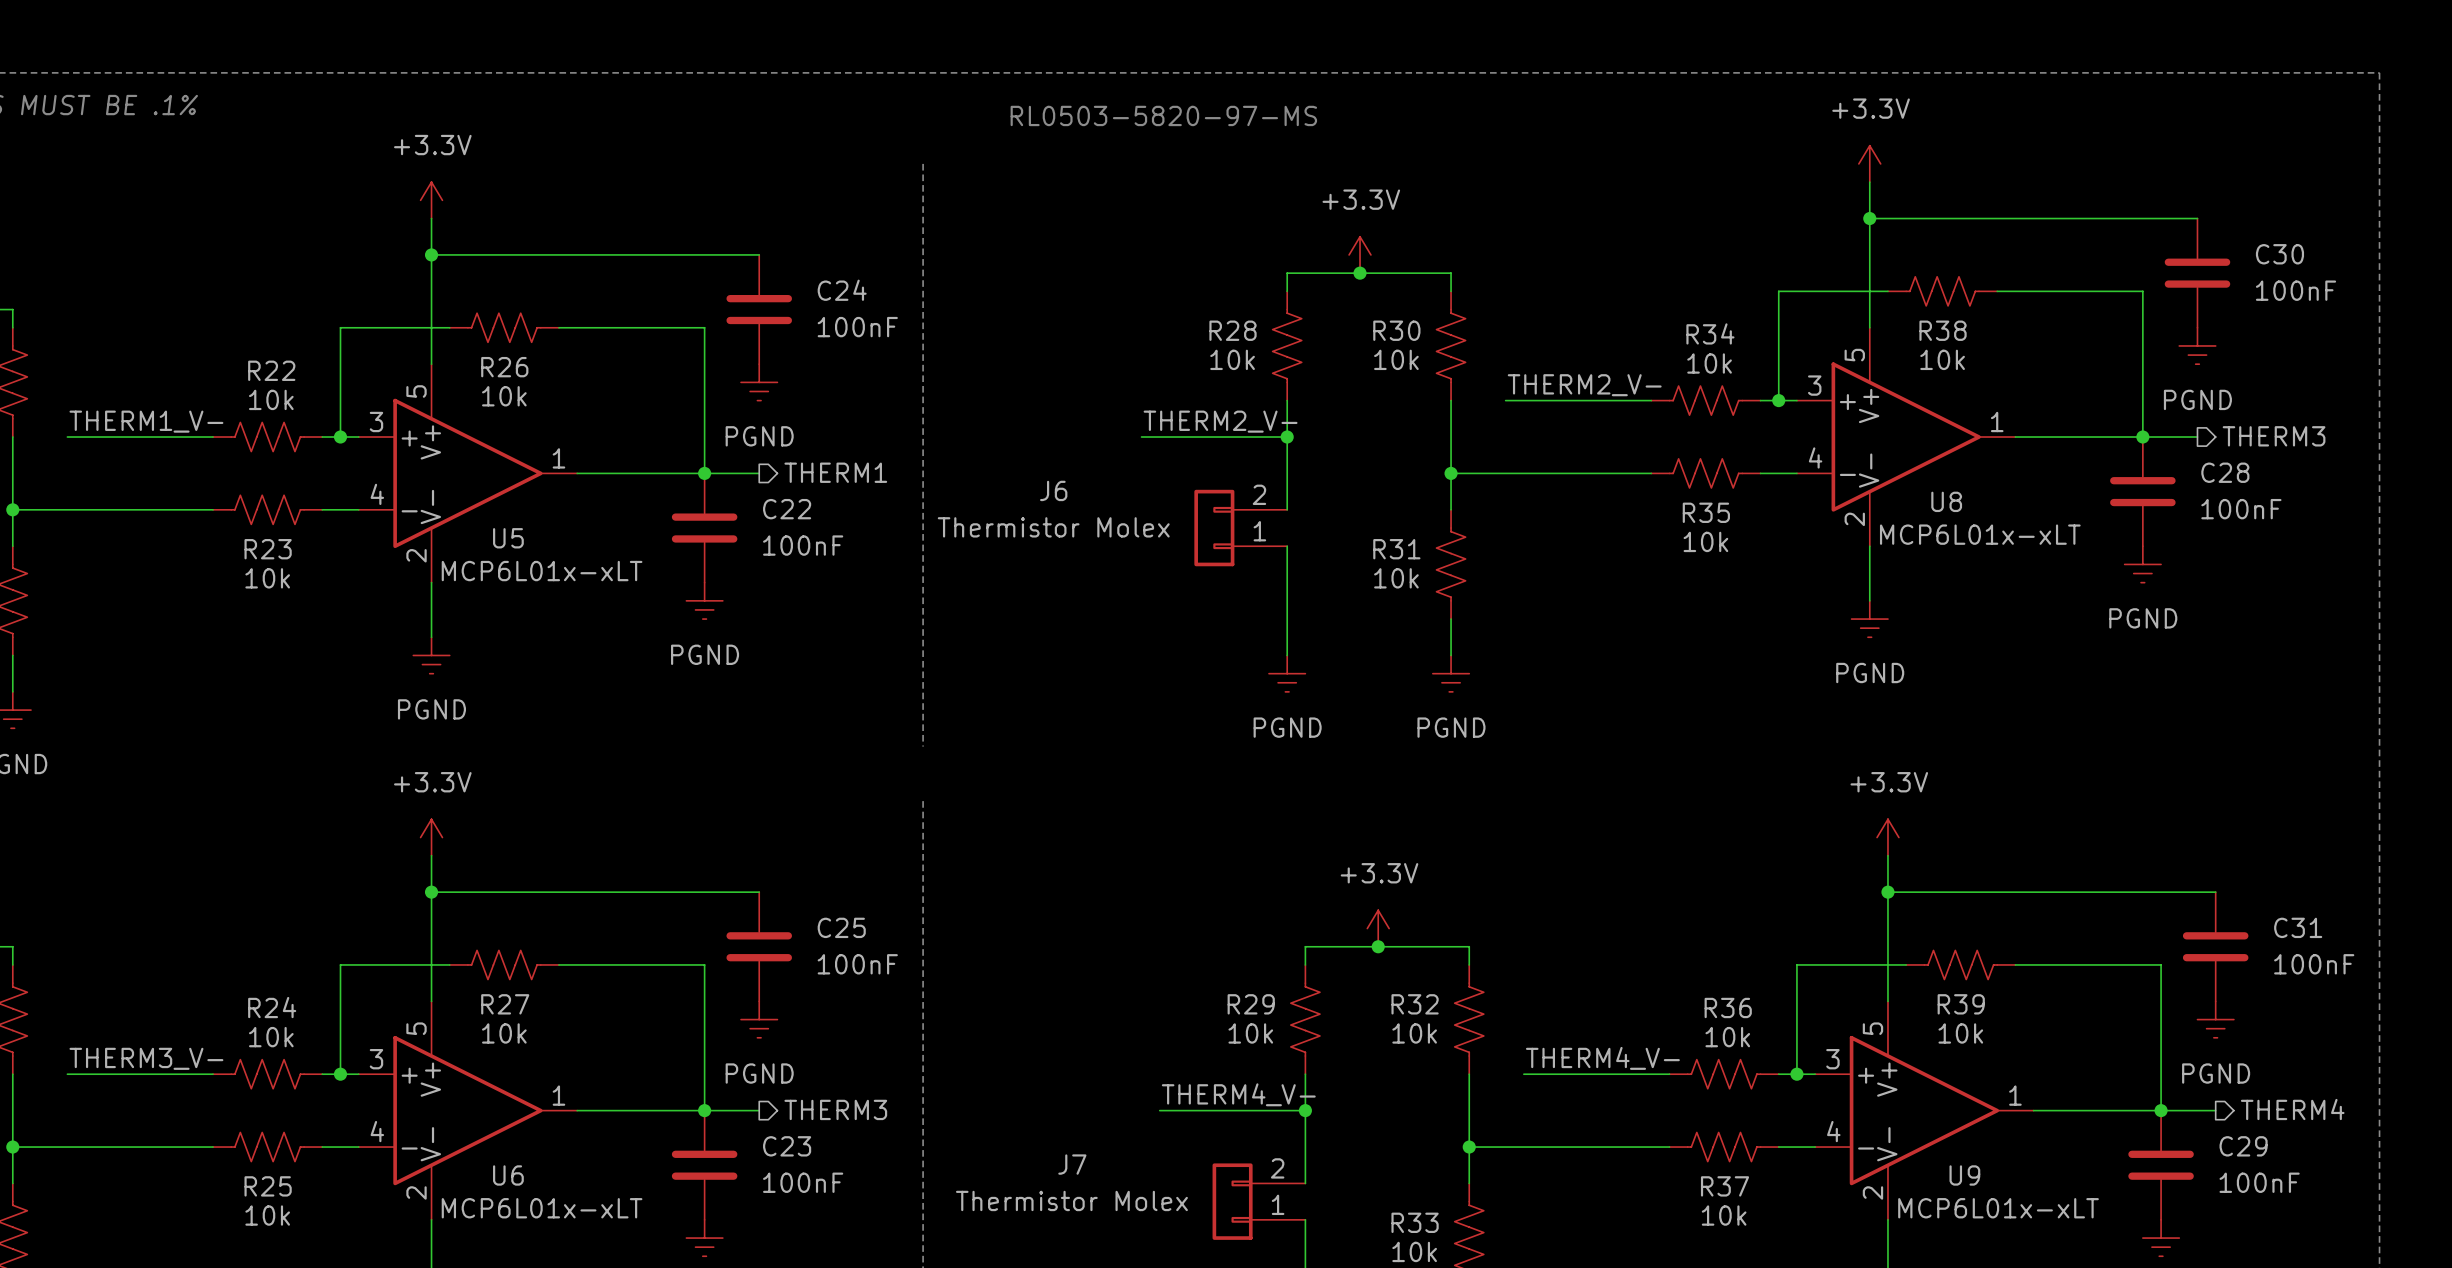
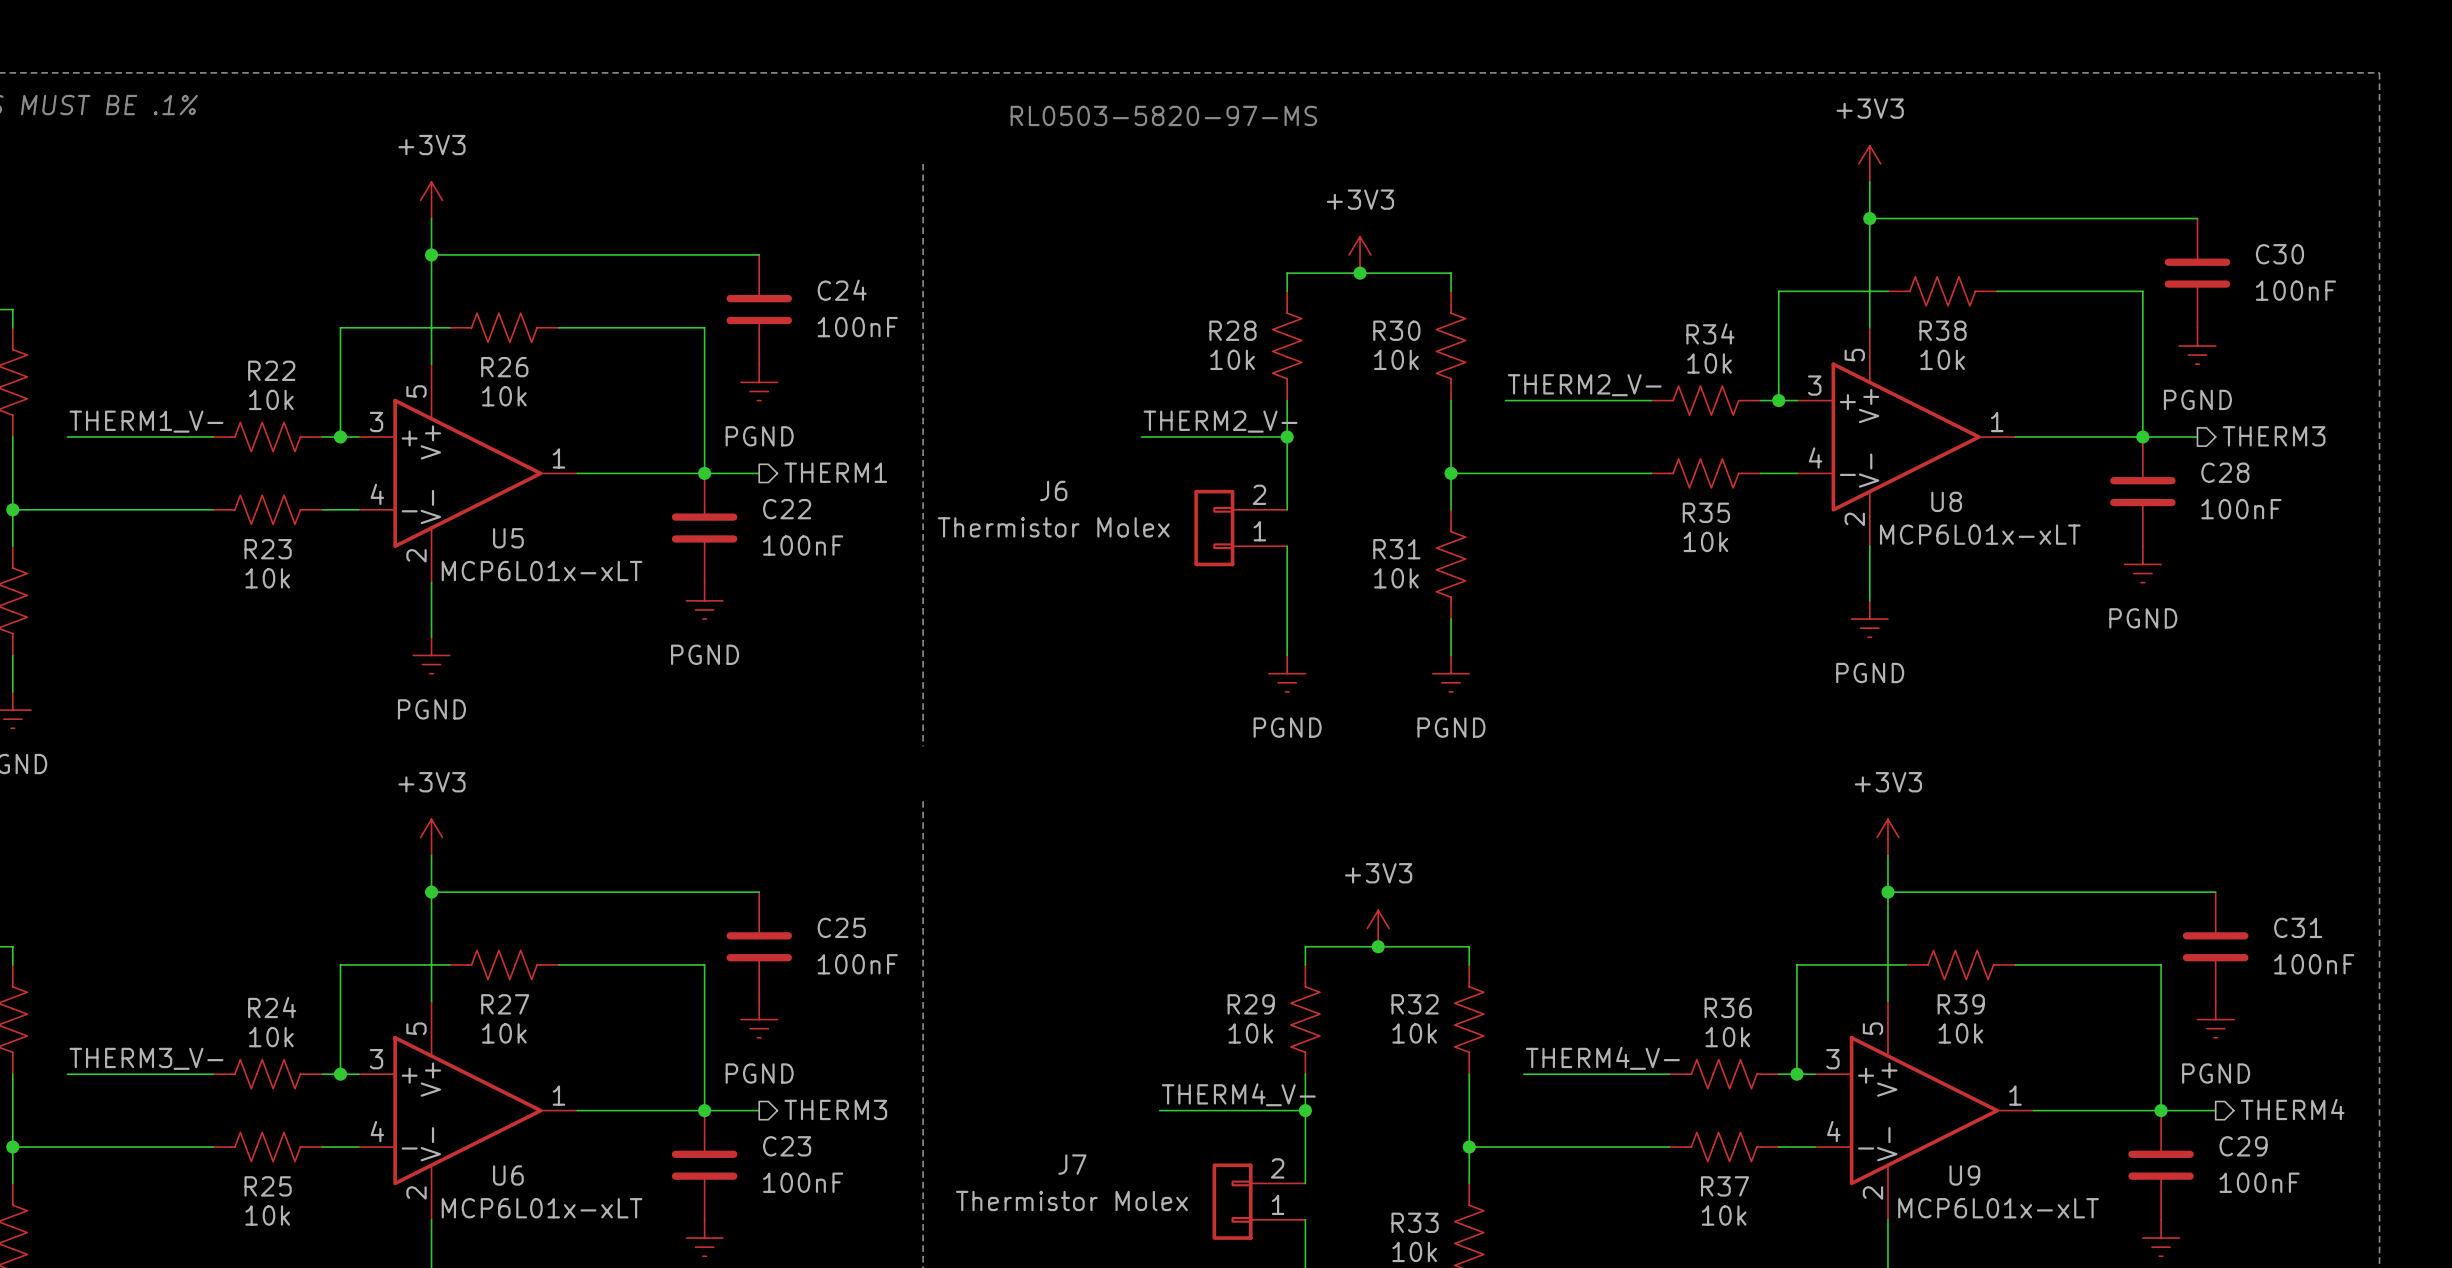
power symbol: +3.3V (1869, 163) -> +3V3 (1869, 163)
power symbol: +3.3V (431, 200) -> +3V3 (431, 200)
power symbol: +3.3V (1360, 254) -> +3V3 (1360, 254)
power symbol: +3.3V (431, 837) -> +3V3 (431, 837)
power symbol: +3.3V (1887, 837) -> +3V3 (1887, 837)
power symbol: +3.3V (1378, 928) -> +3V3 (1378, 928)

